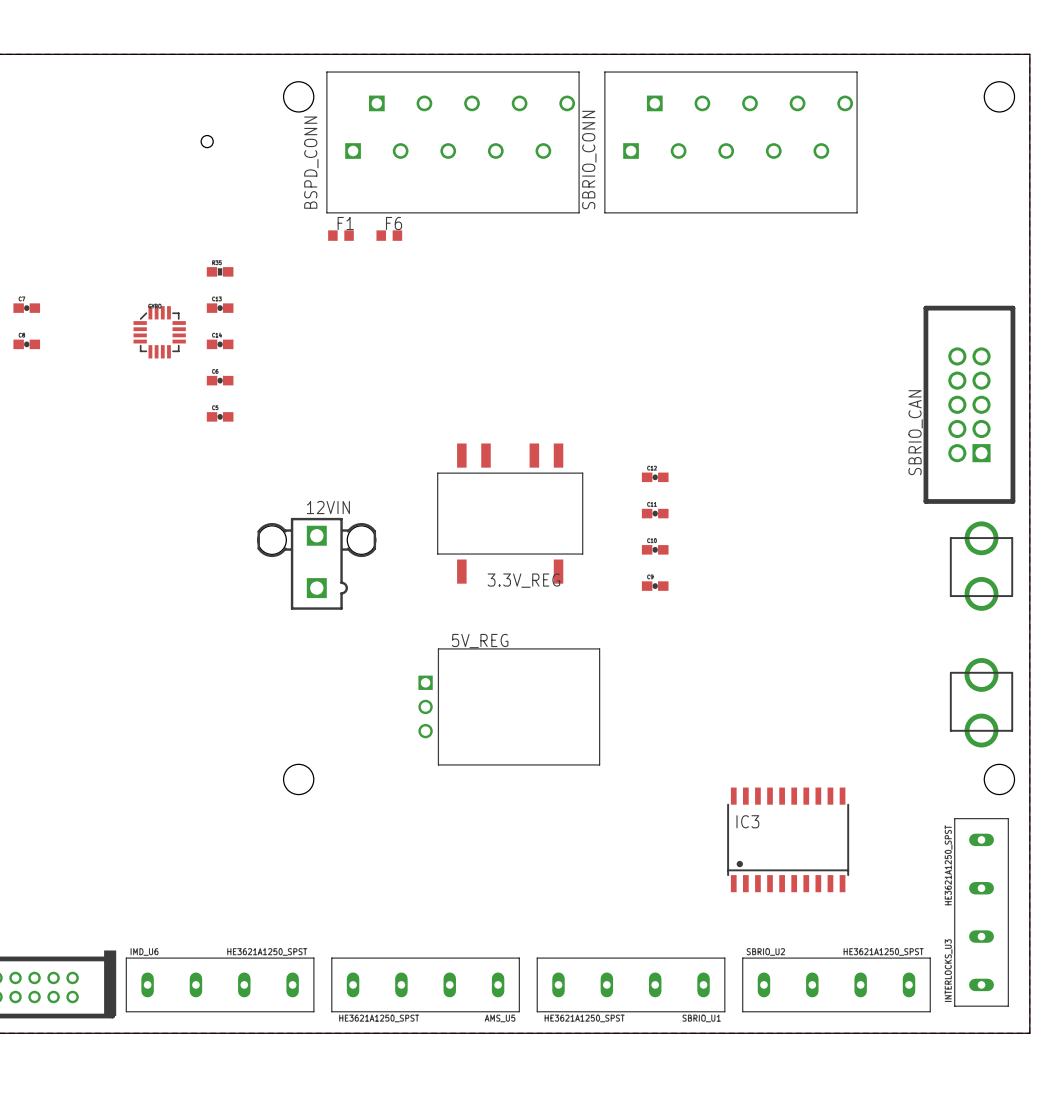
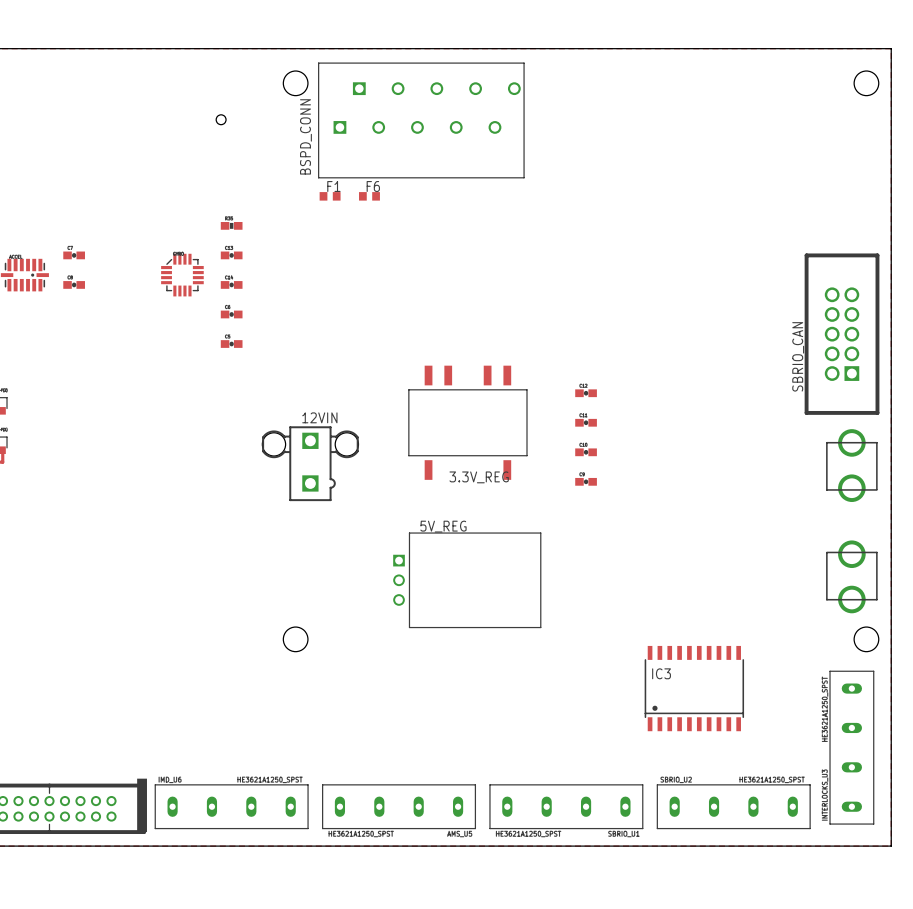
SBRIO_CONN: (730, 142) -> none

